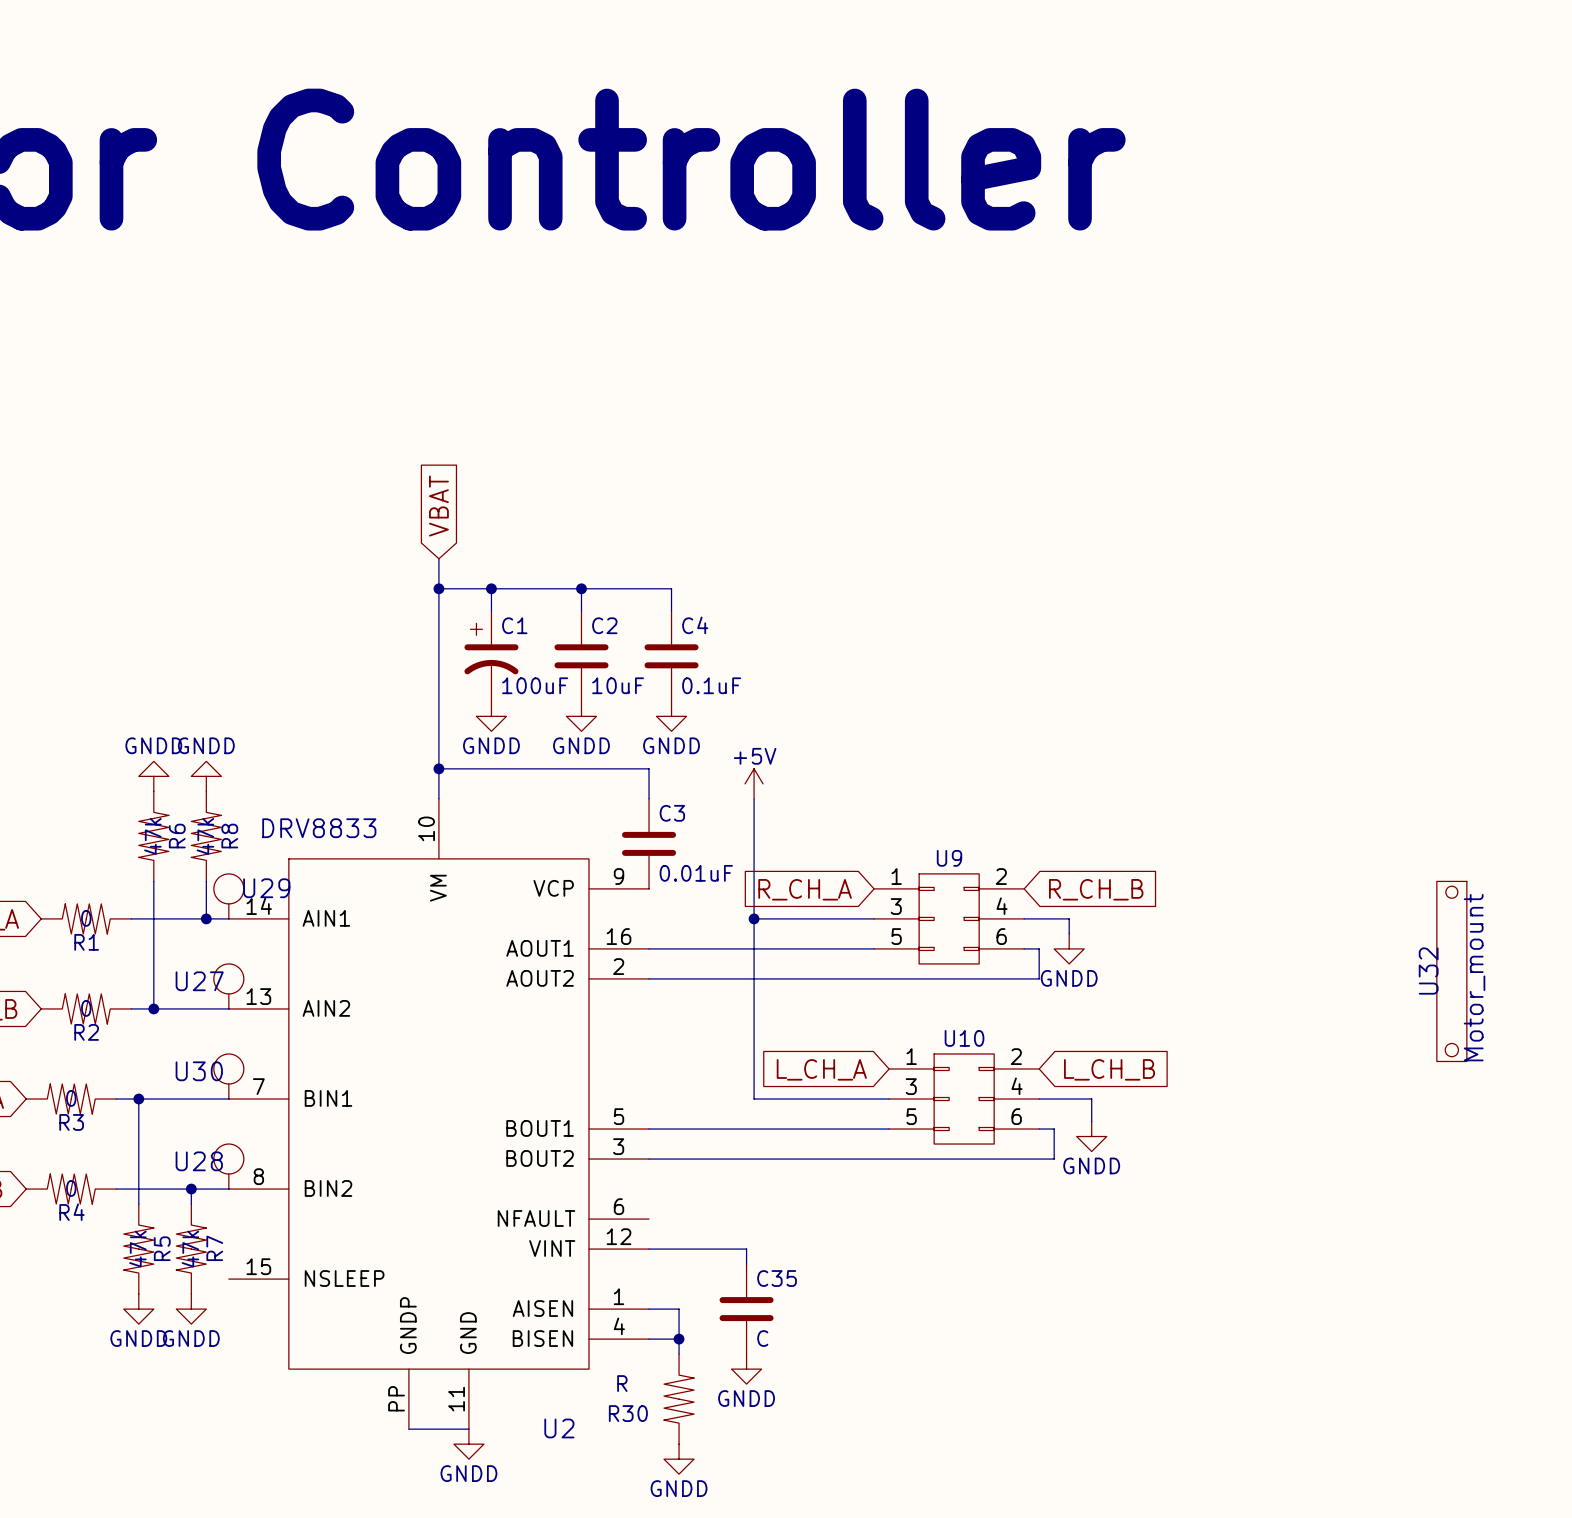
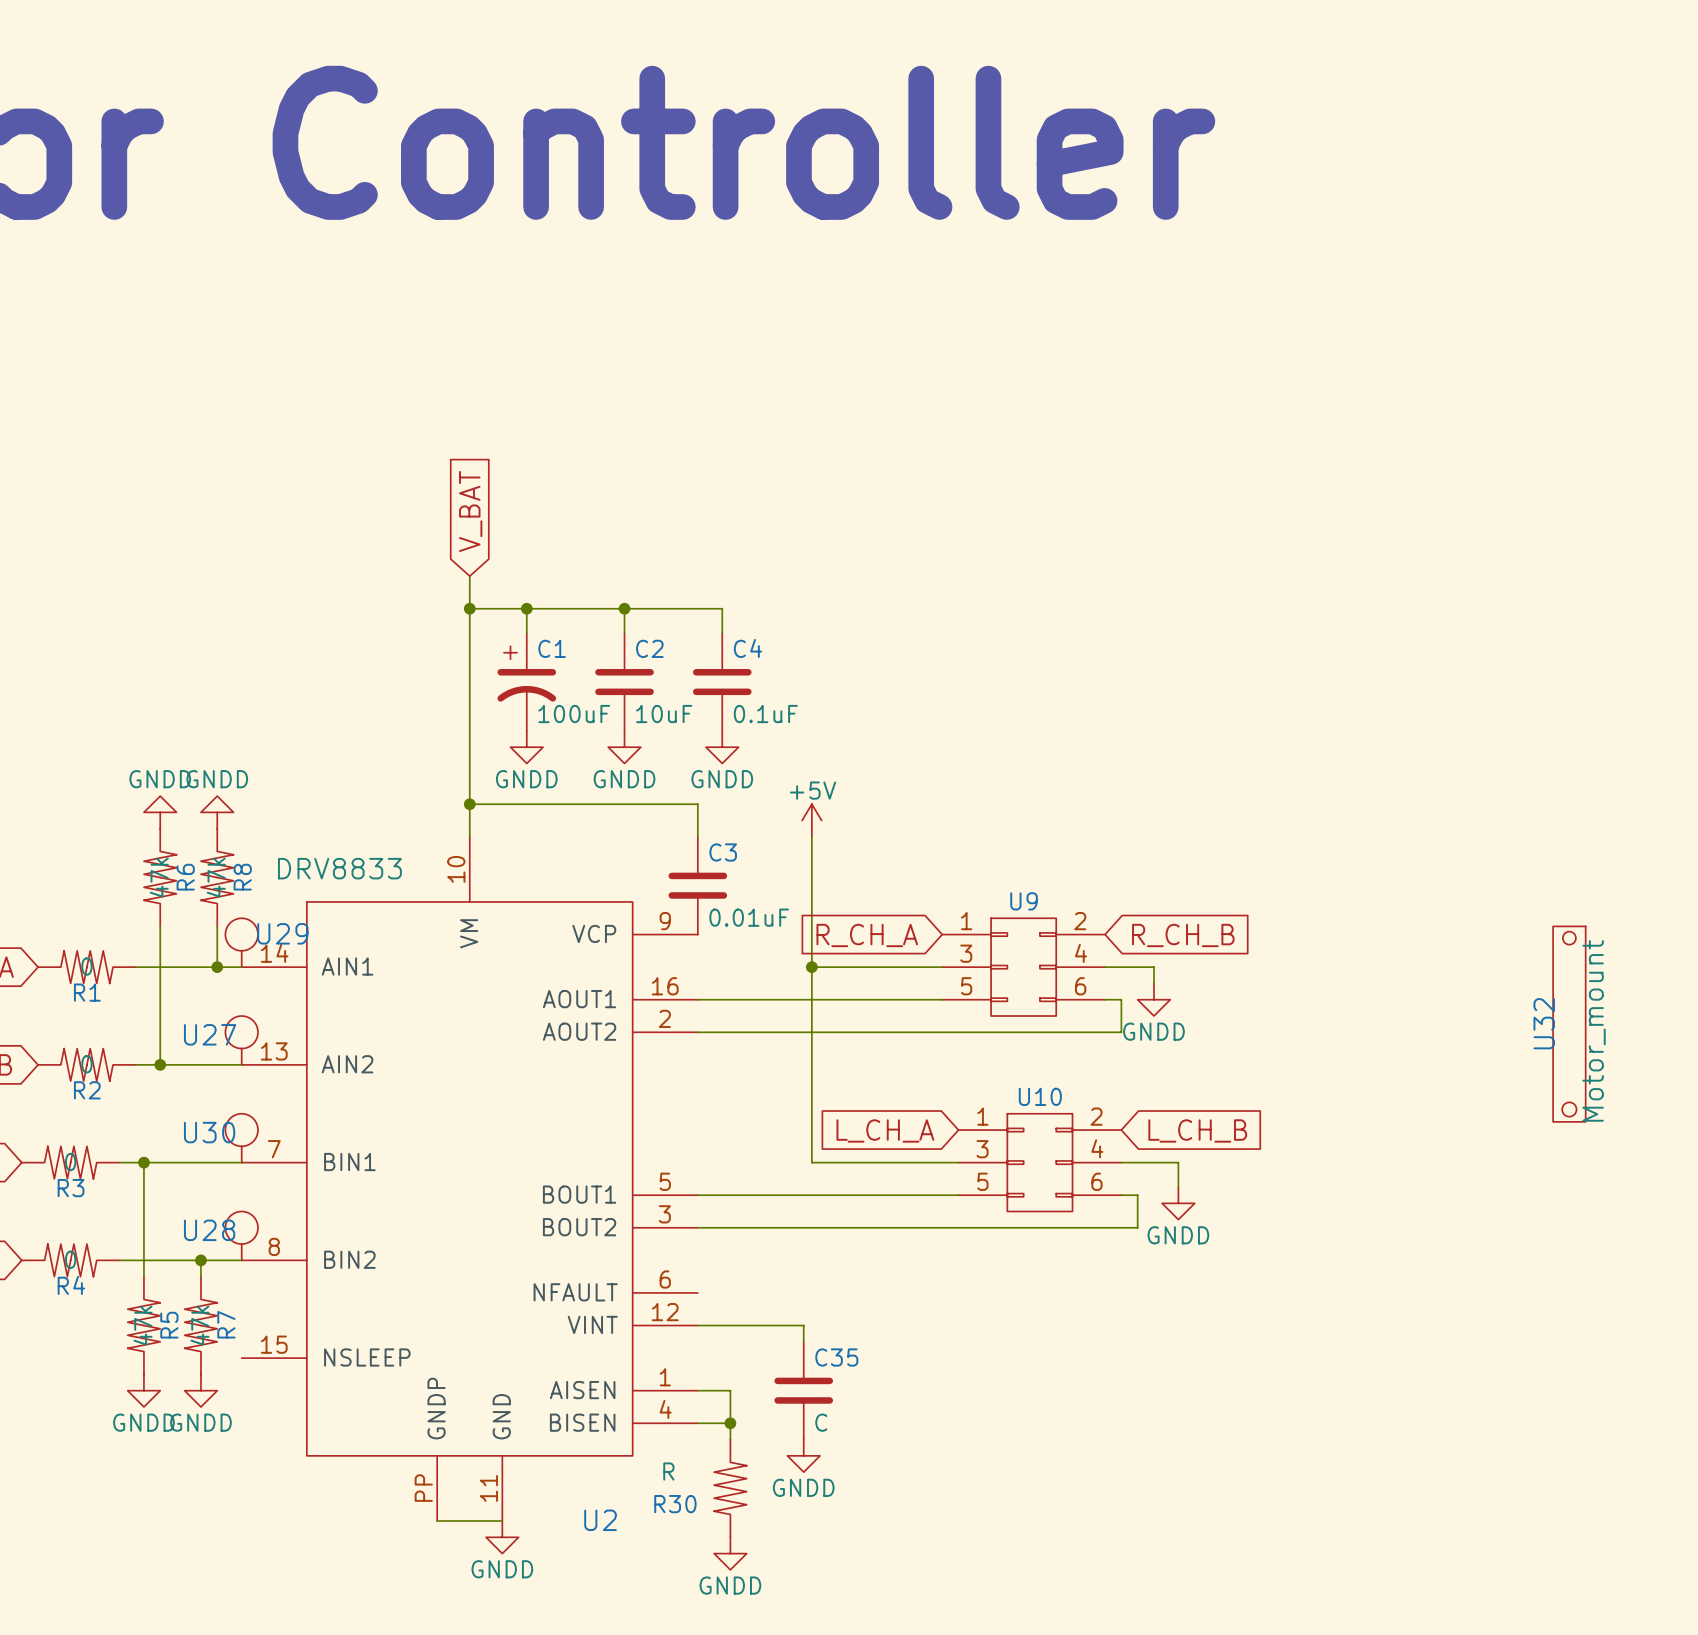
global label: VBAT (438, 506) -> V_BAT (470, 511)

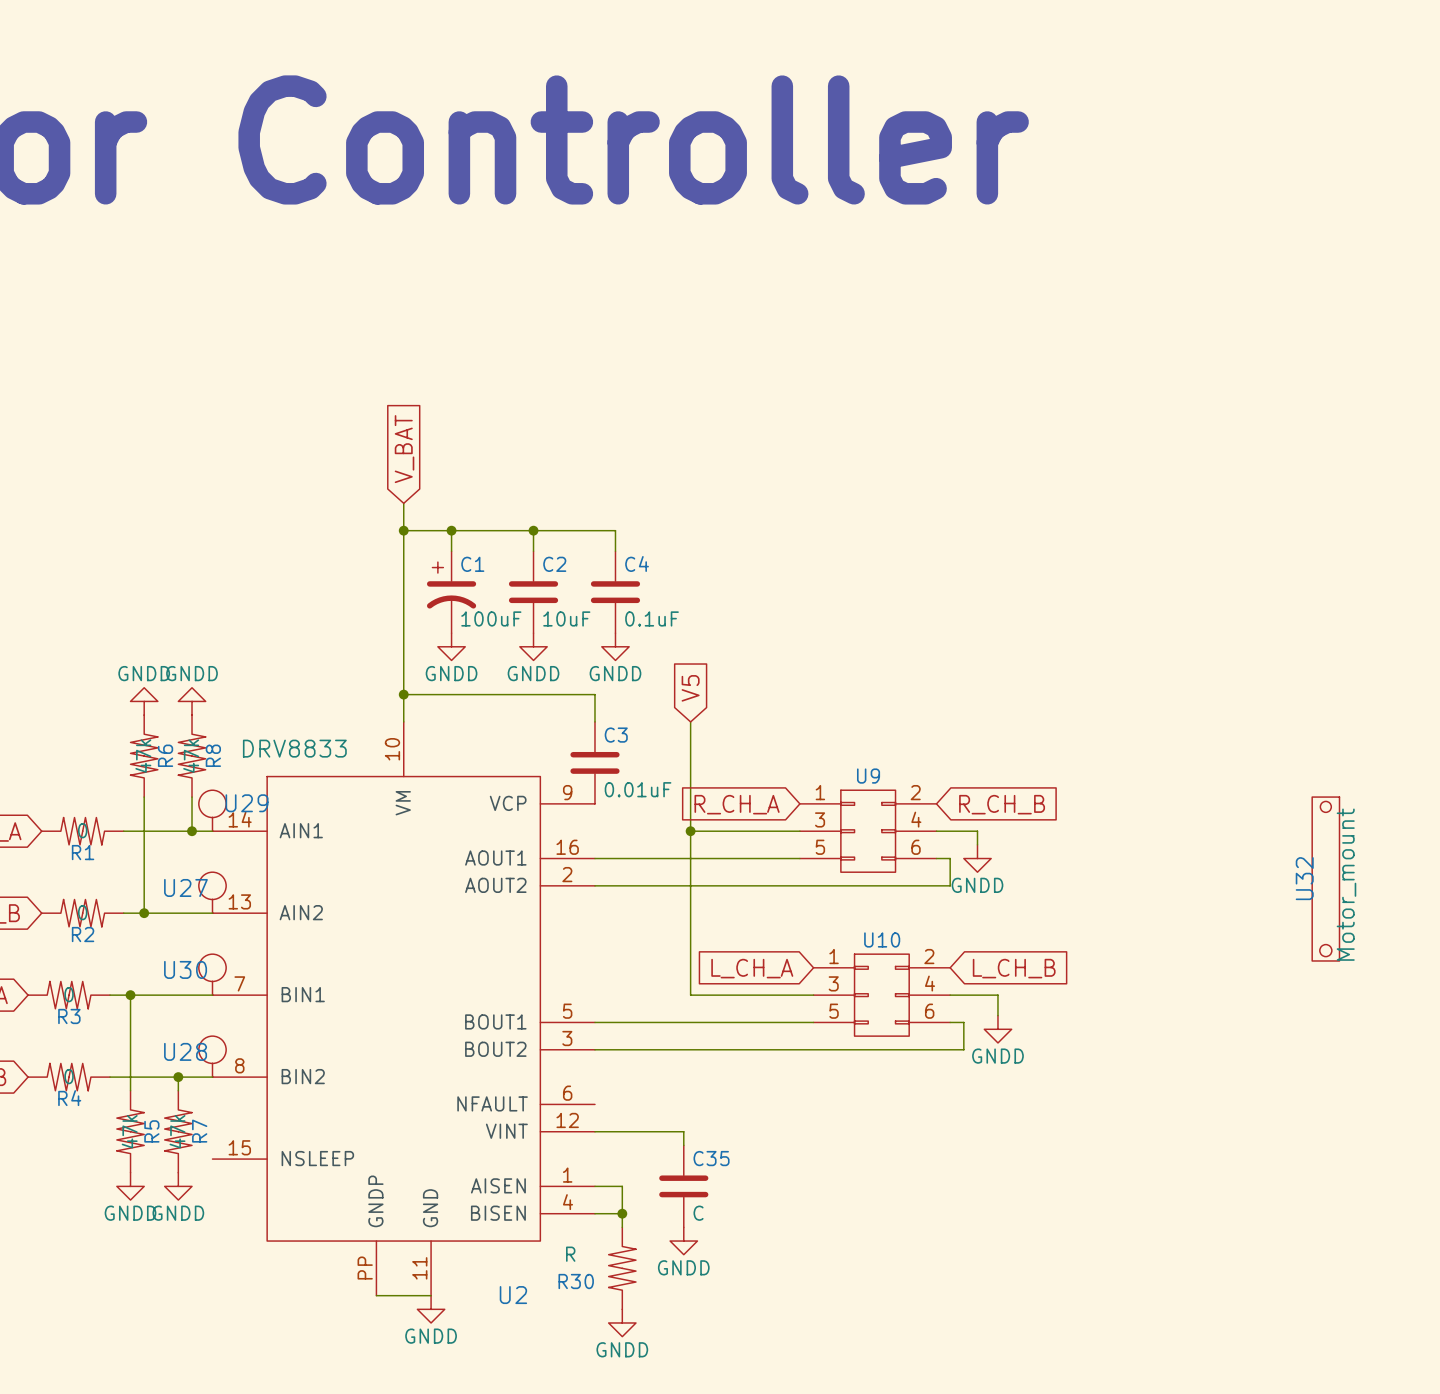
global label: none -> V5 (690, 688)
power symbol: +5V (811, 820) -> none

